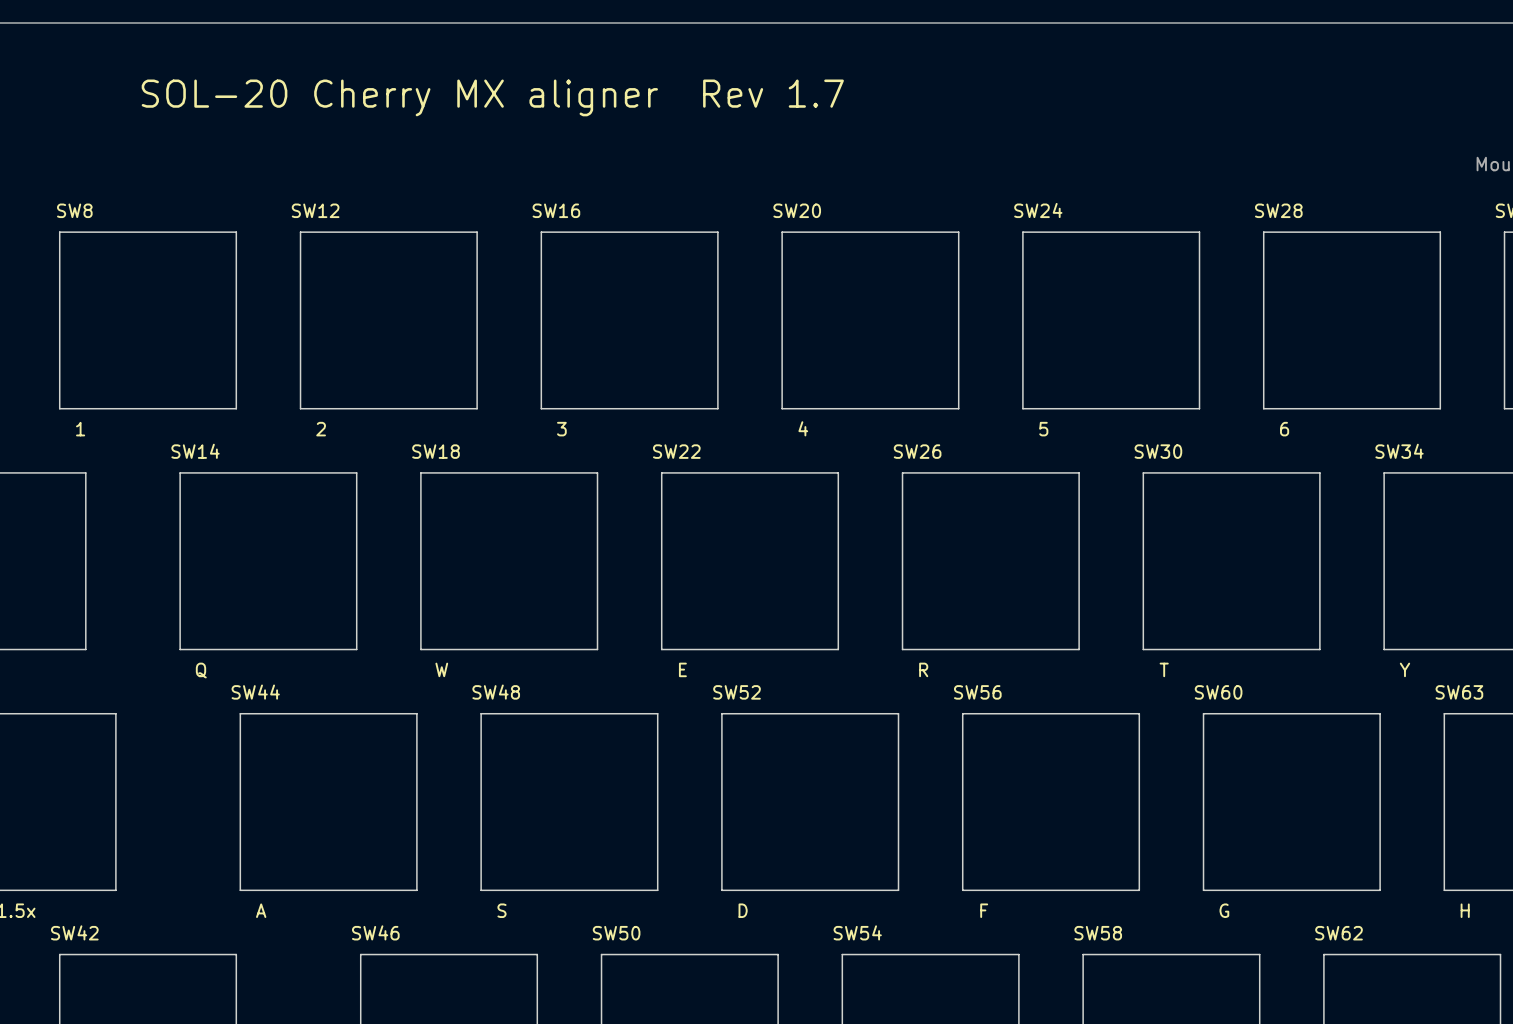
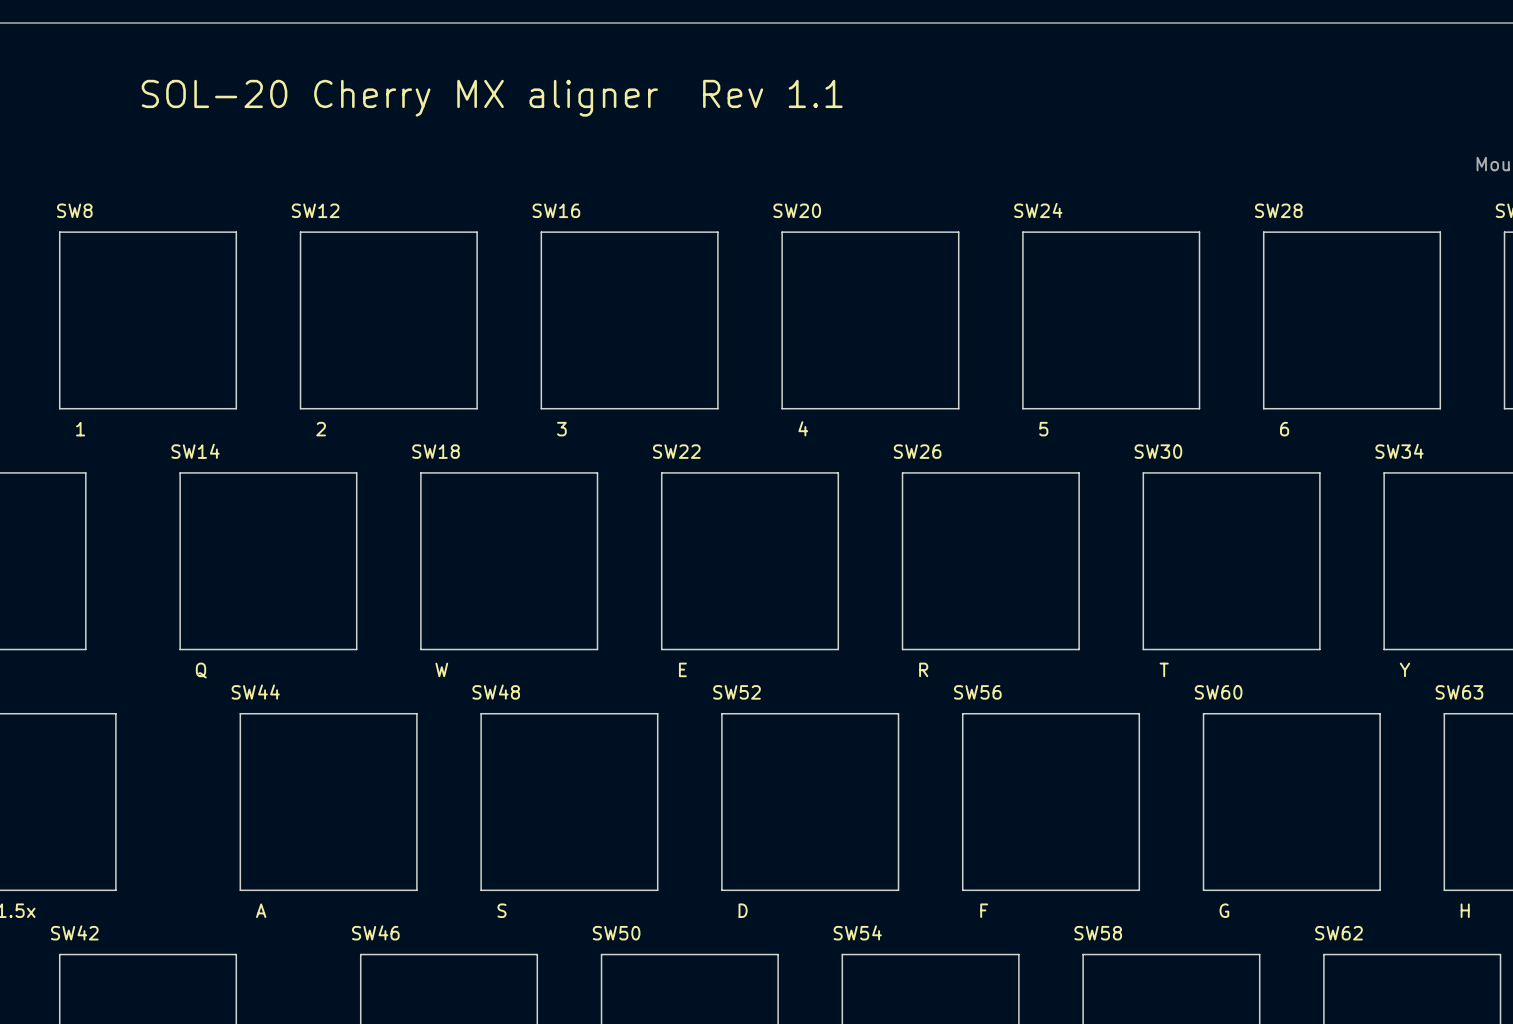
text: SOL-20 Cherry MX aligner Rev 1.7 (492, 97) -> SOL-20 Cherry MX aligner Rev 1.1 (492, 98)

